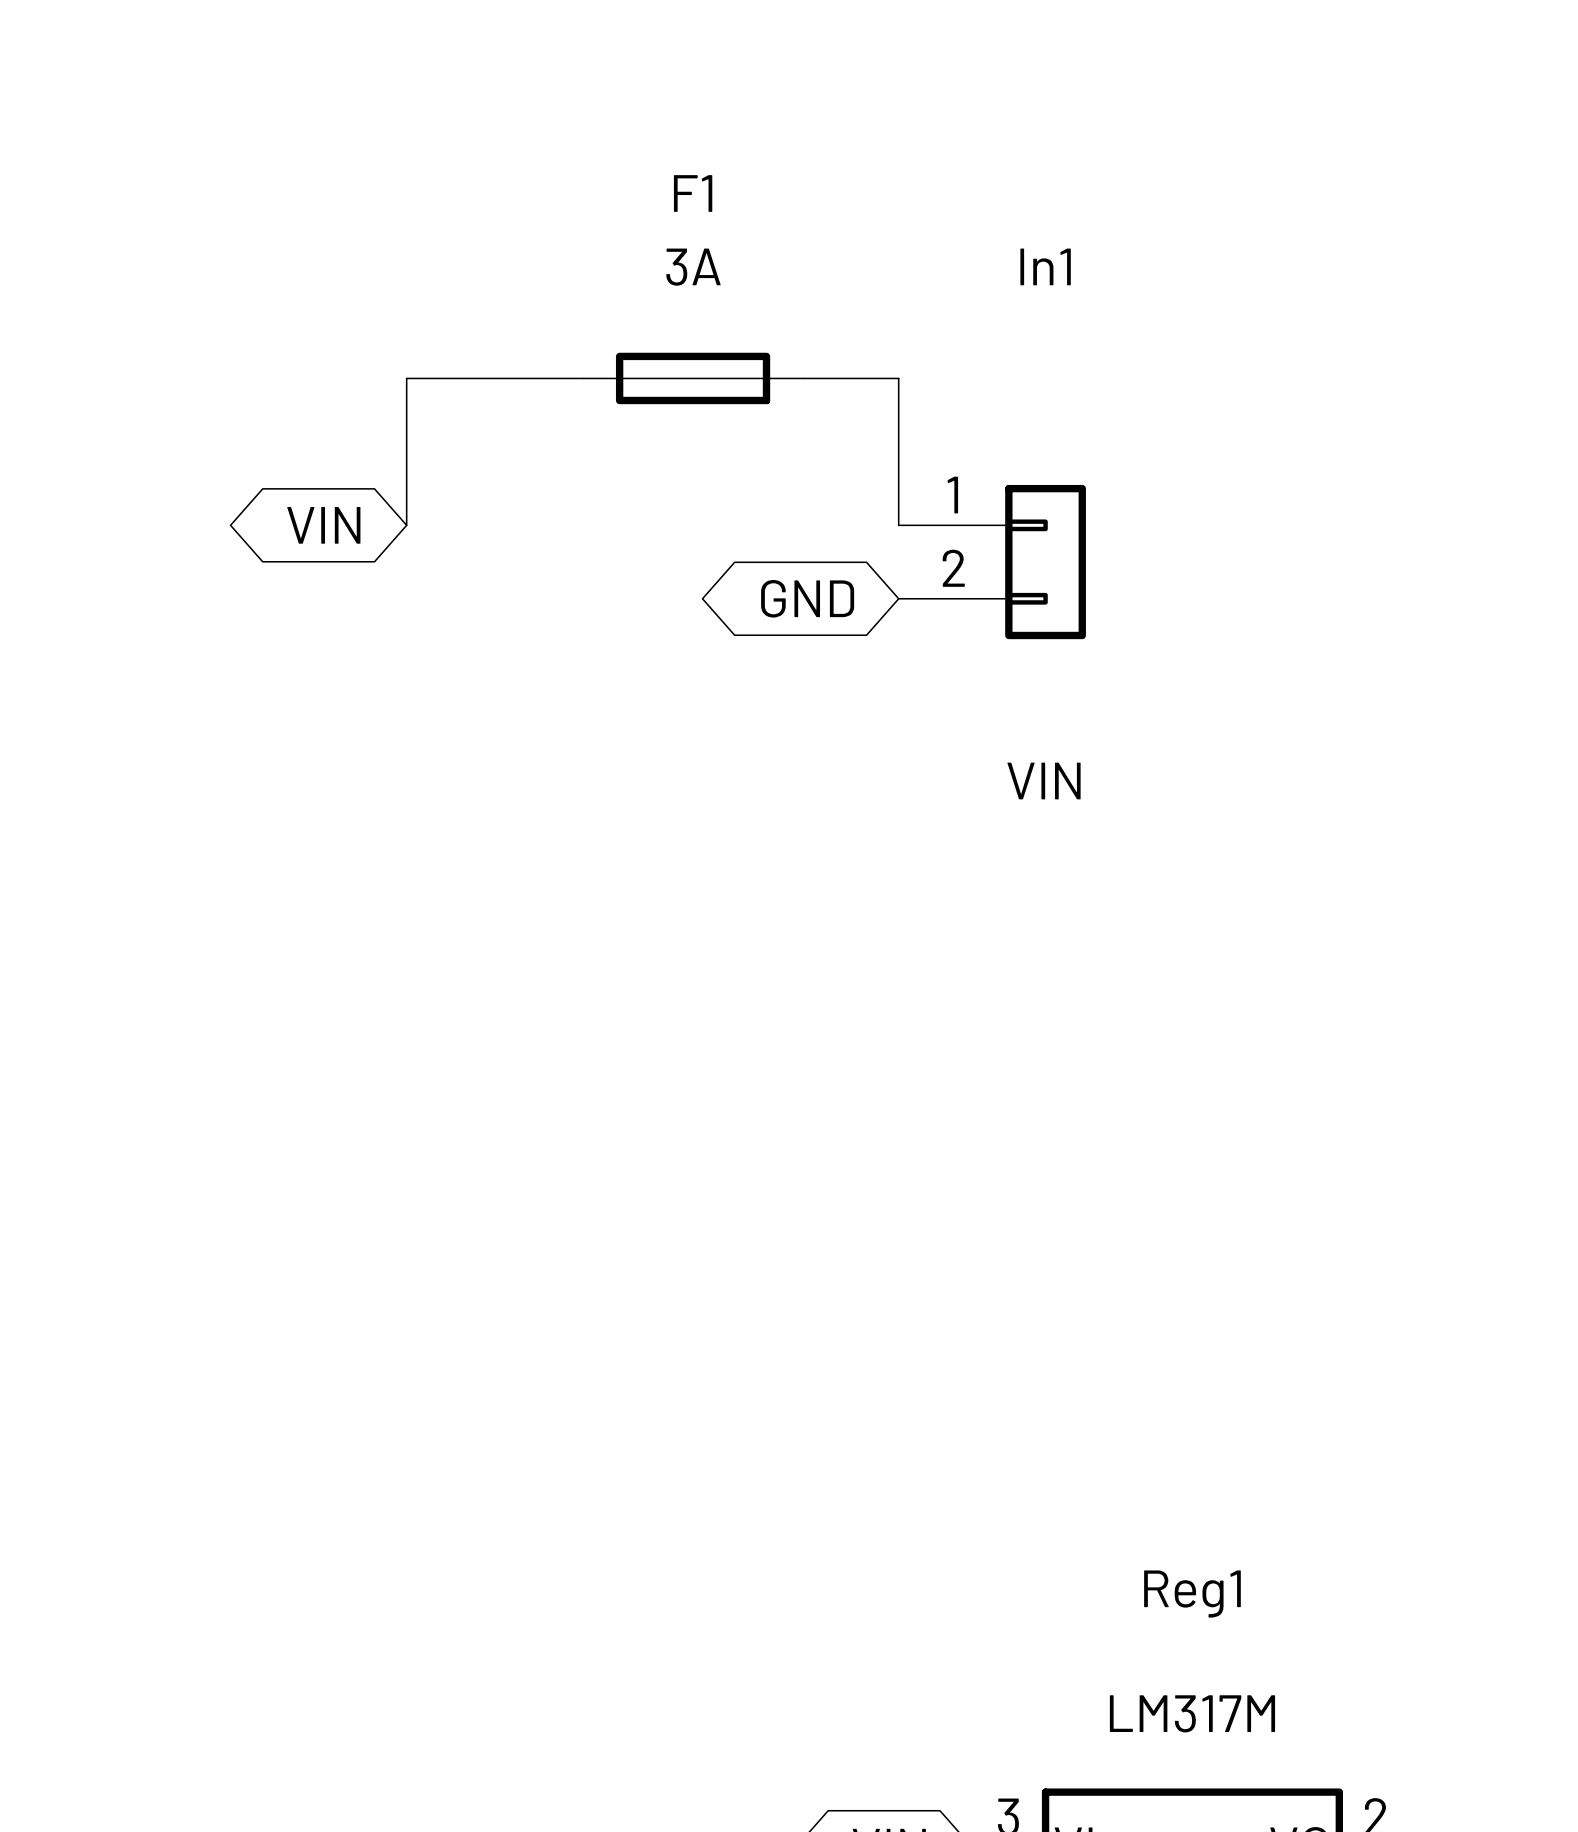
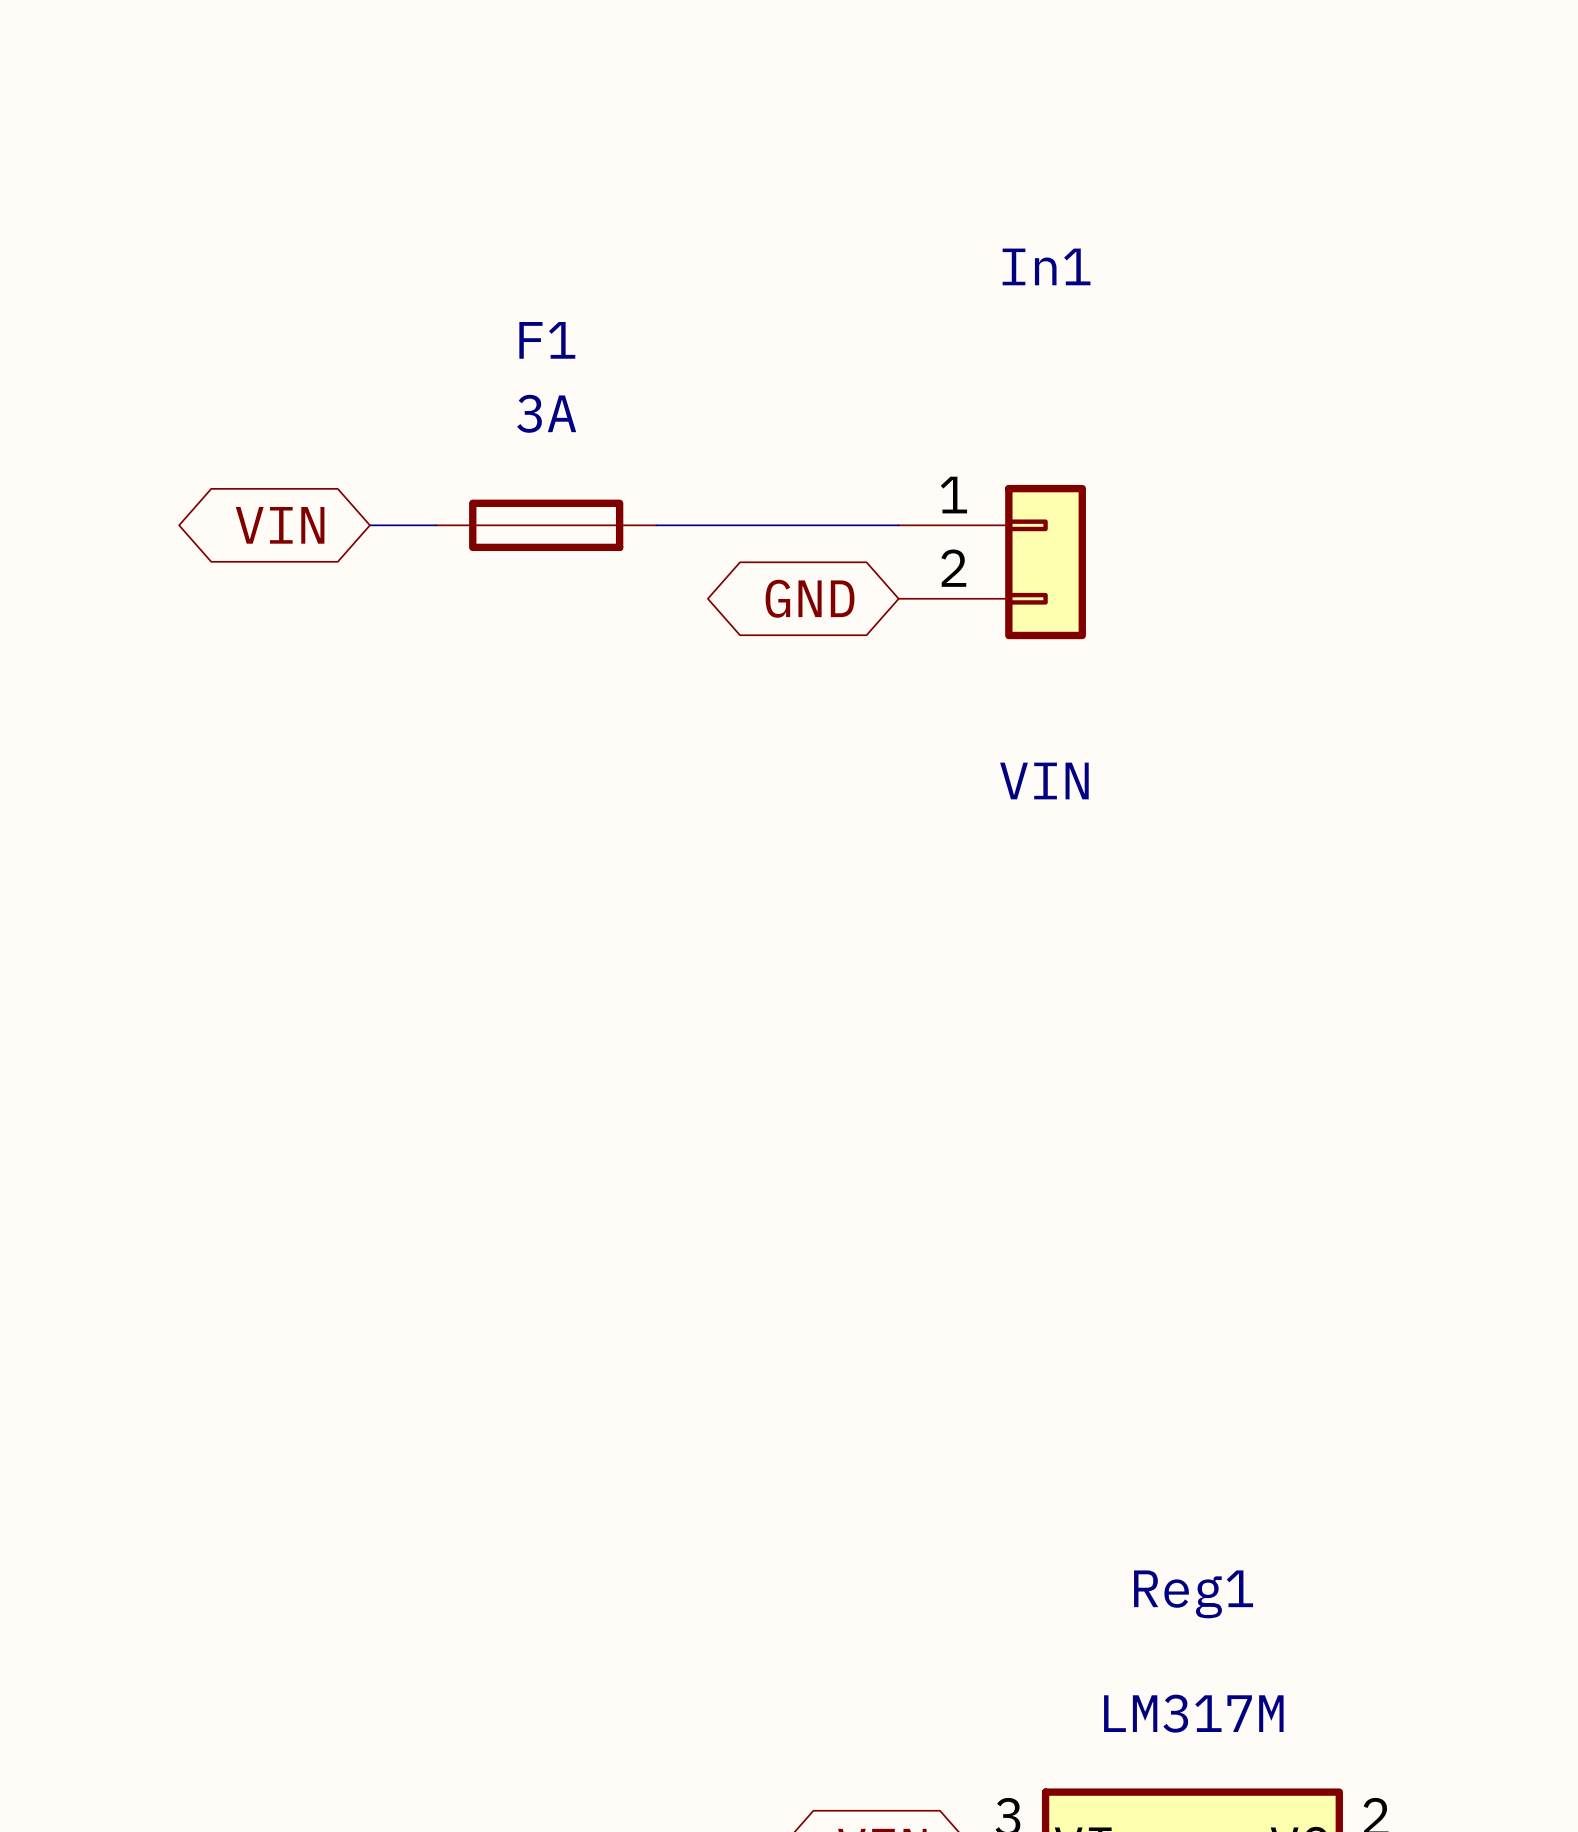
wire: (582, 378) (406, 378) (406, 525) -> none
F1 position: (693, 378) -> (546, 525)
wire: (803, 378) (898, 378) (898, 525) -> (656, 525) (898, 525)
global label position: VIN (323, 525) -> VIN (280, 525)
wire: none -> (369, 525) (436, 525)

